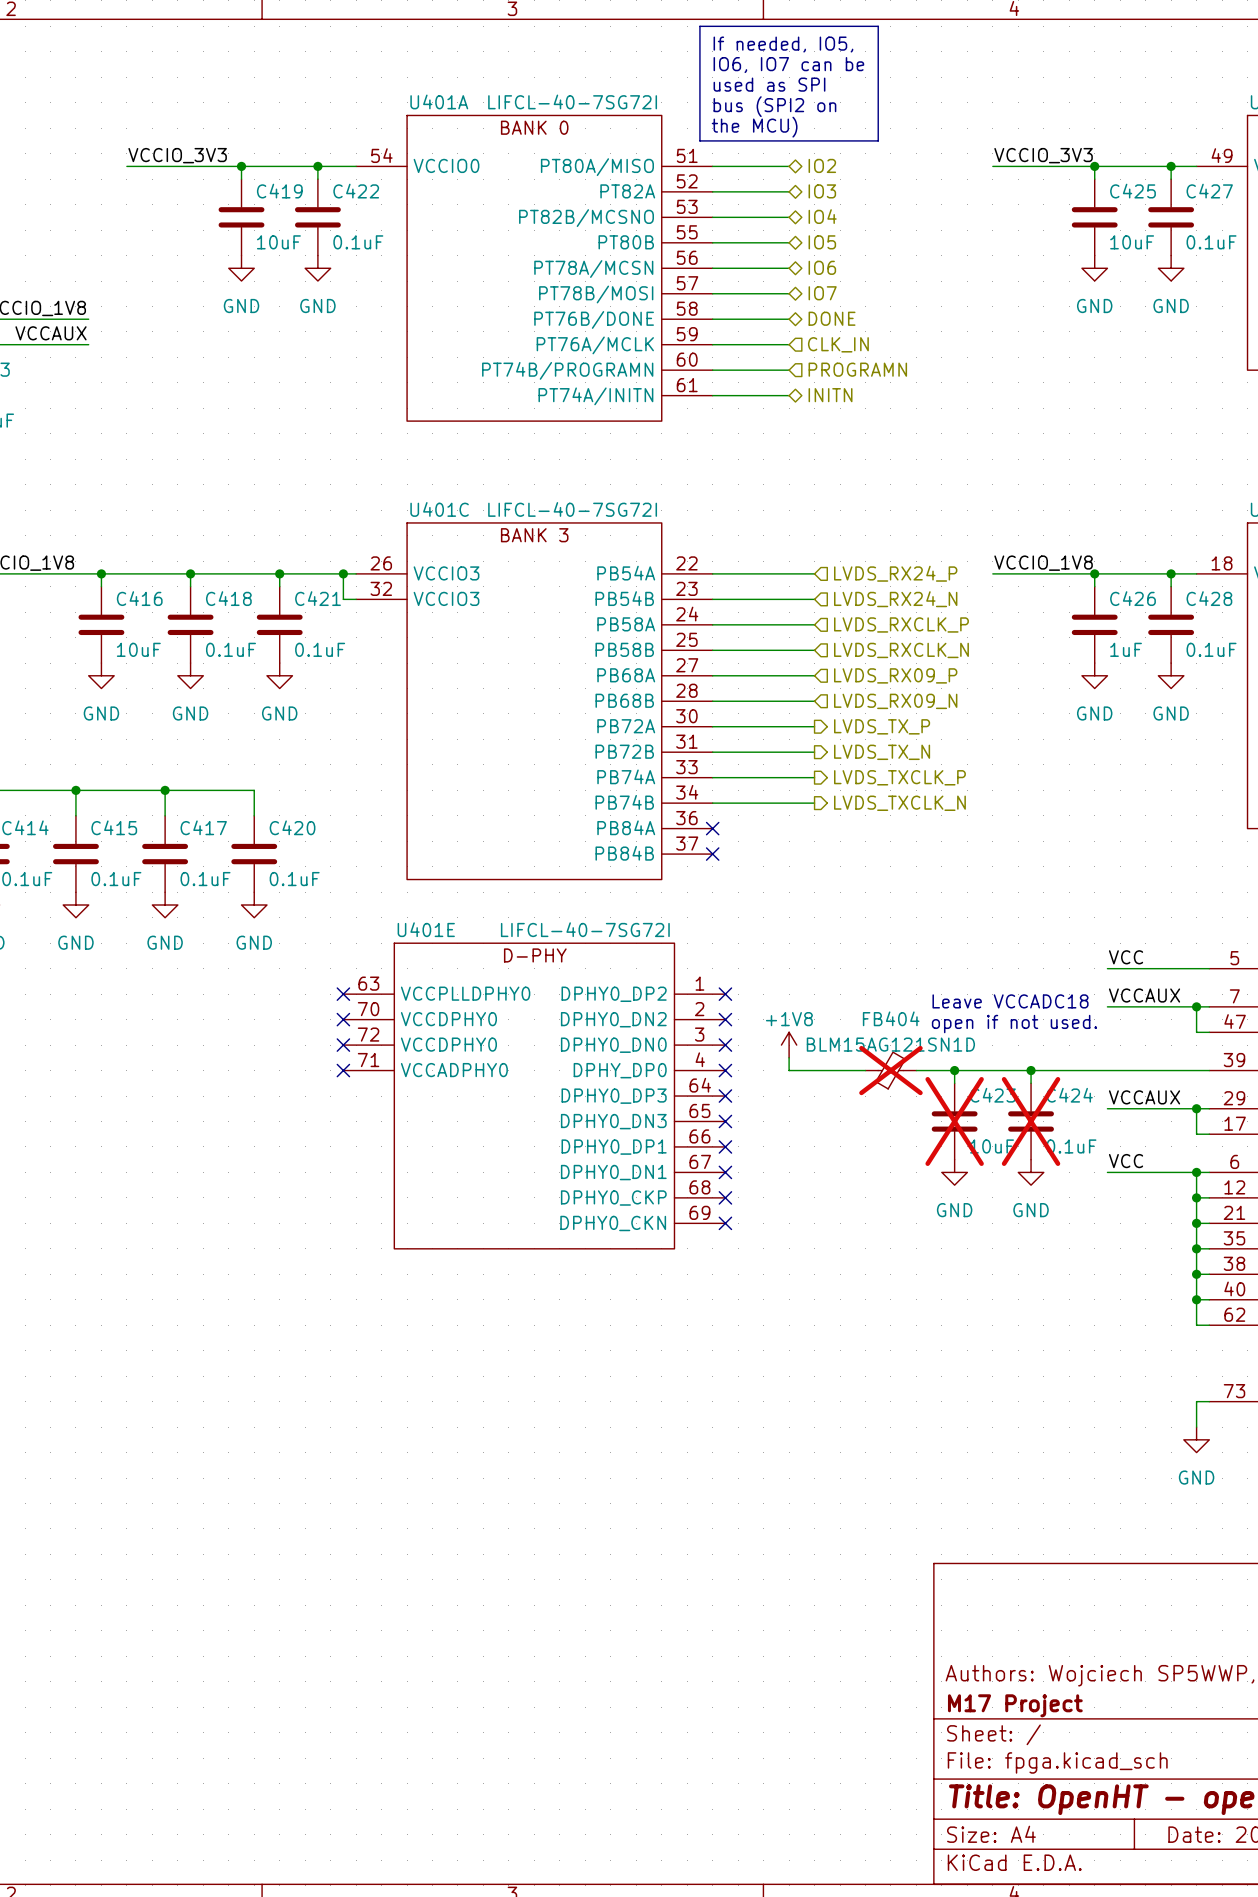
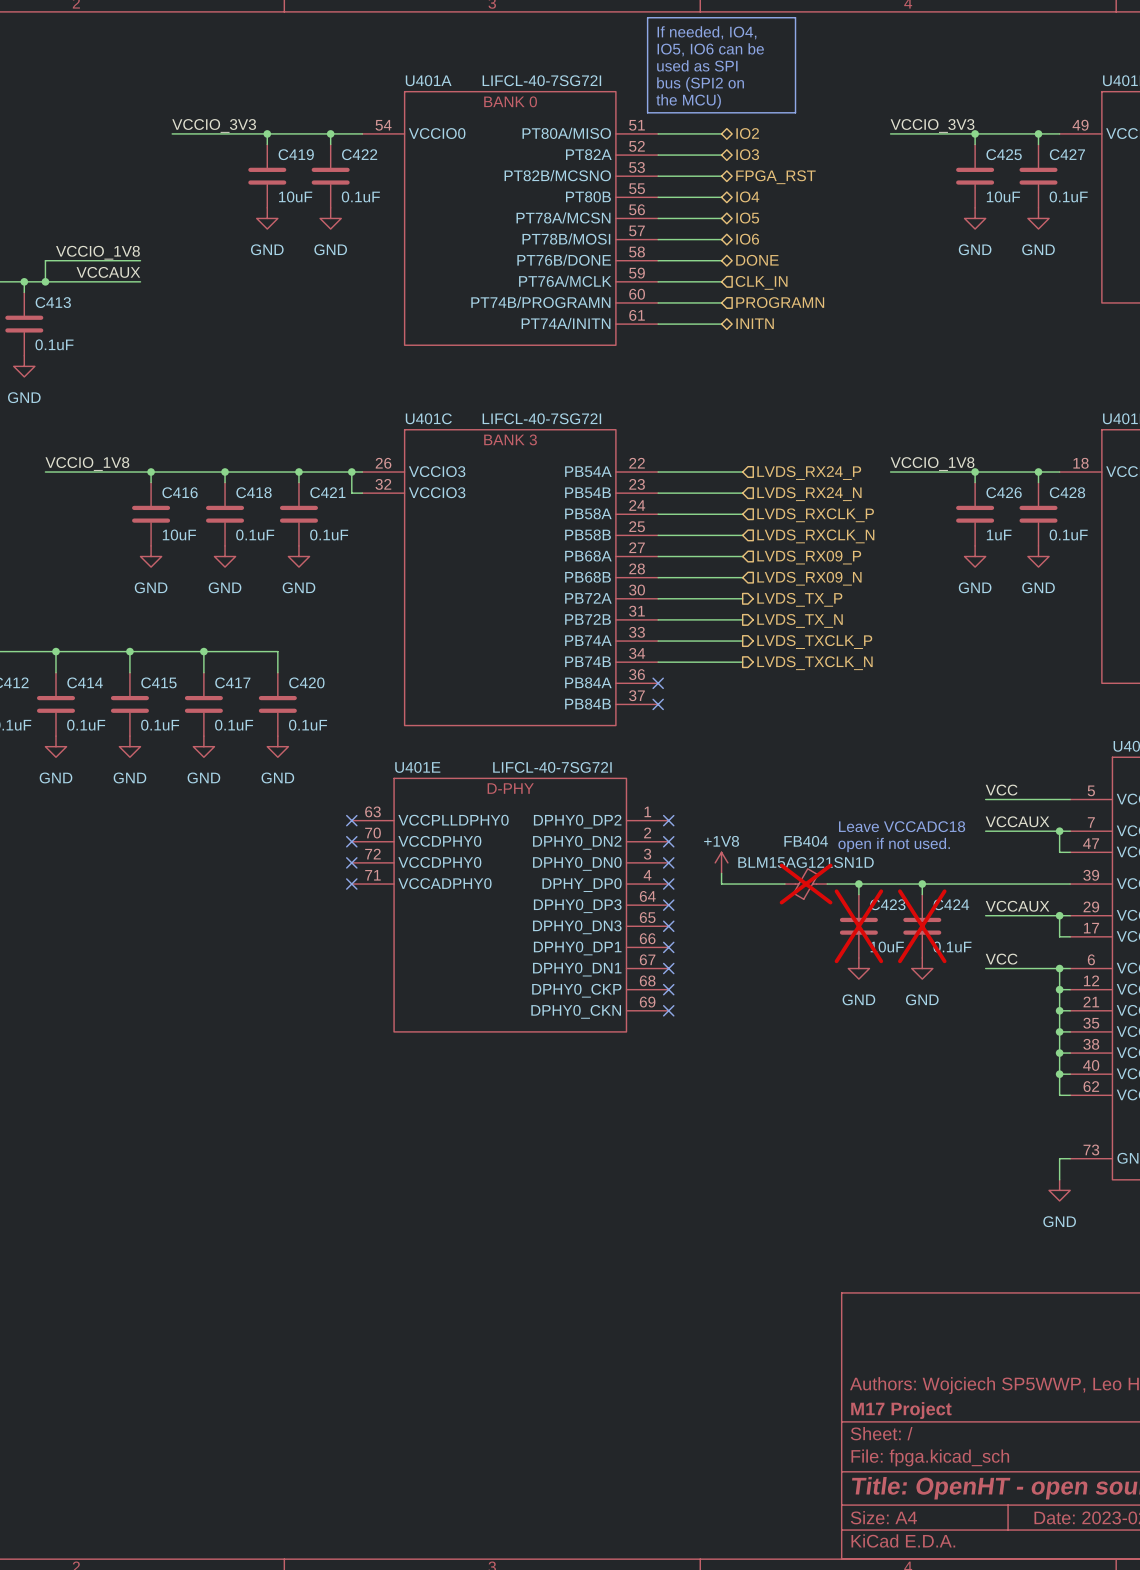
text: If needed, IO5, (783, 44) -> If needed, IO4, (706, 32)
text: IO6, IO7 can be (788, 65) -> IO5, IO6 can be (710, 49)
hierarchical label: IO4 (822, 216) -> FPGA_RST (775, 177)
hierarchical label: IO5 (822, 242) -> IO4 (747, 196)
hierarchical label: IO6 (822, 267) -> IO5 (747, 218)
hierarchical label: IO7 (822, 293) -> IO6 (747, 239)

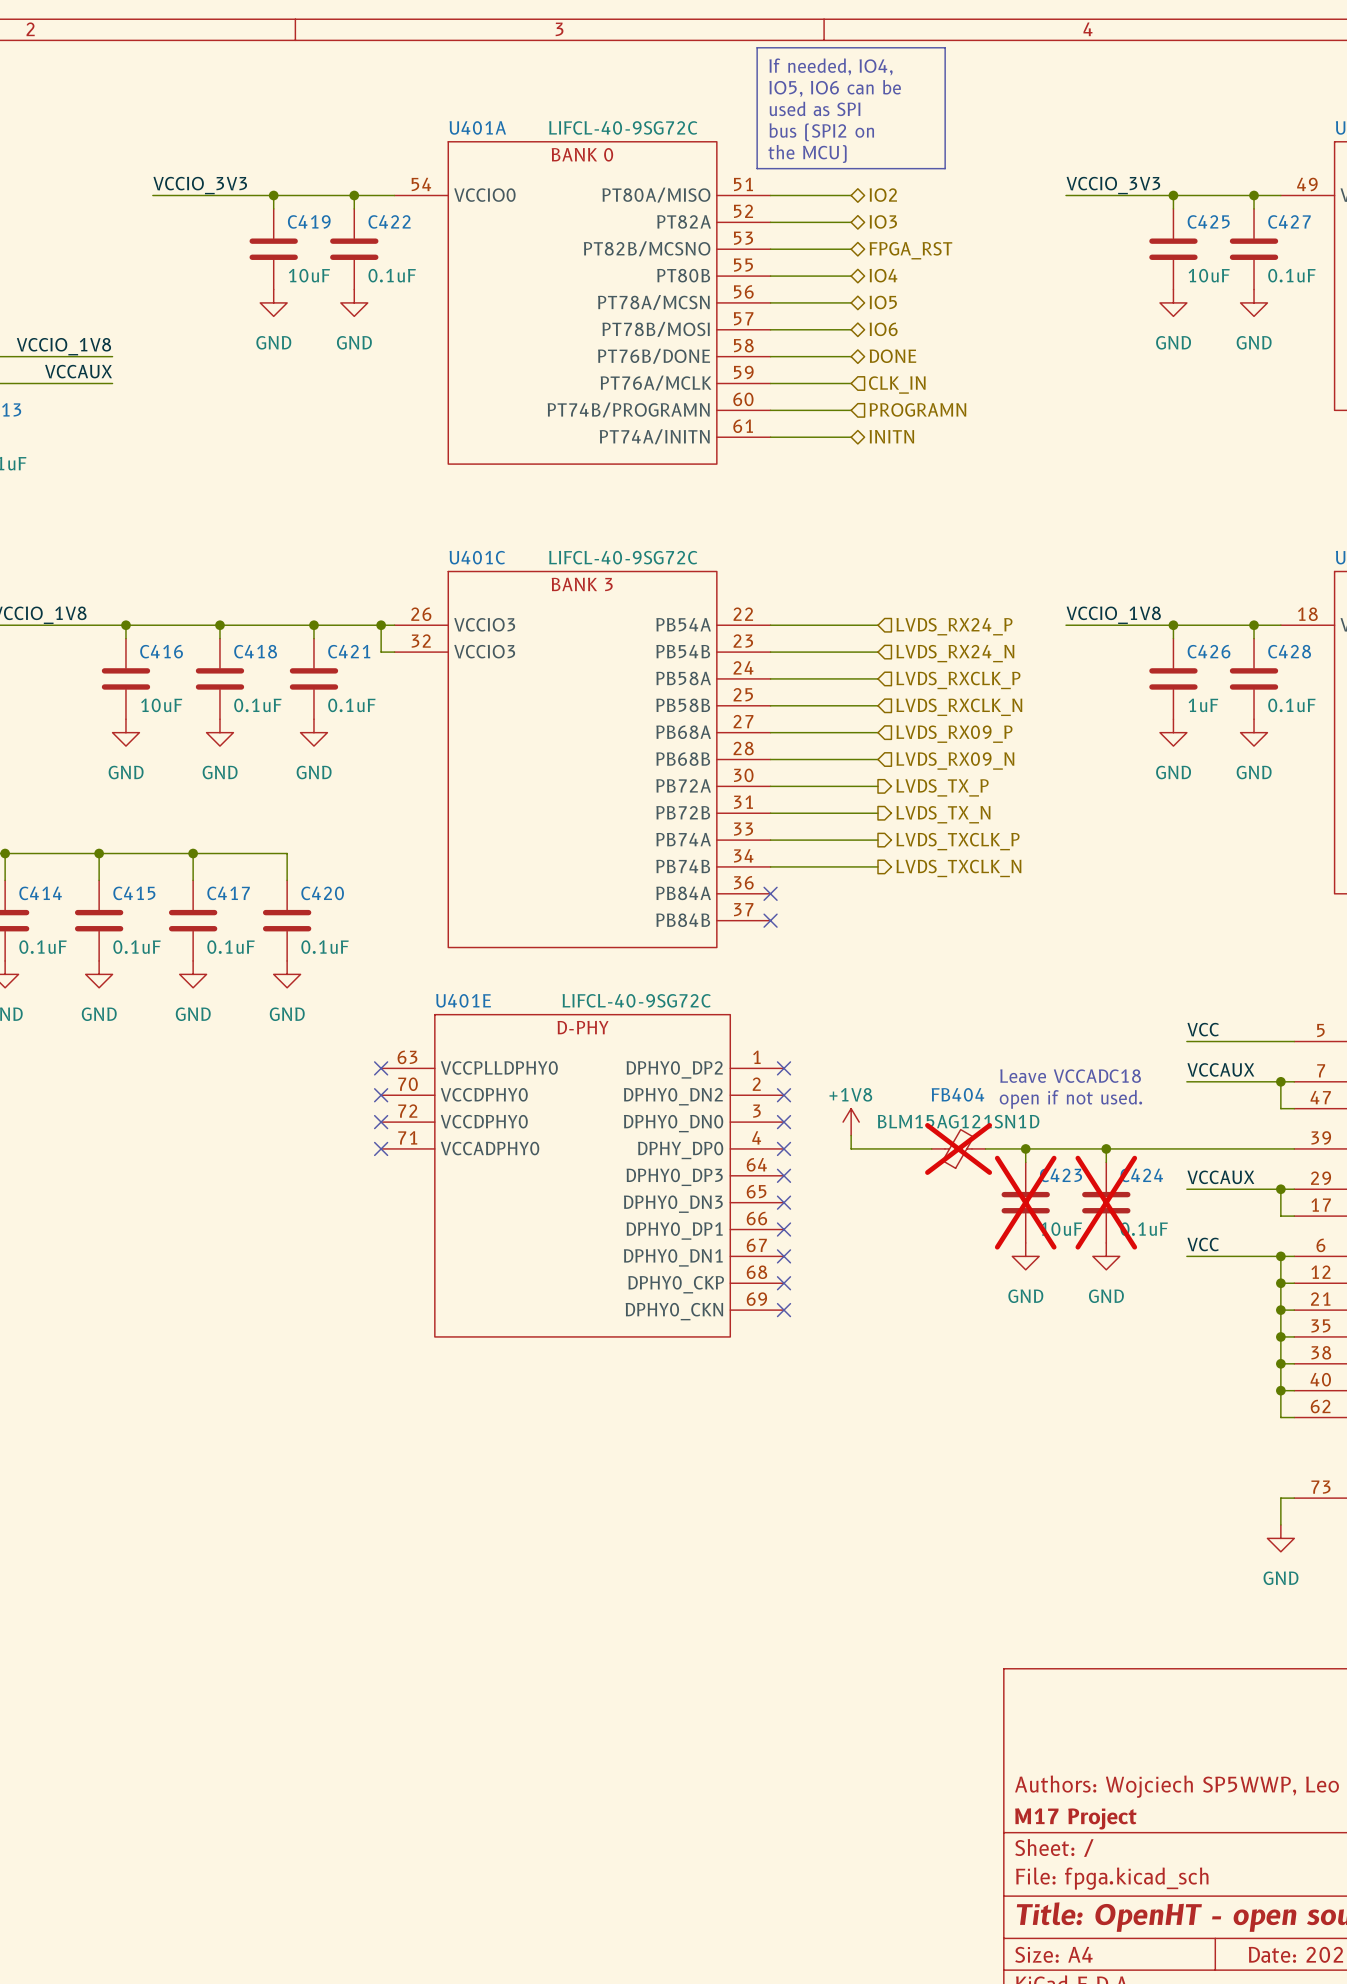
U401A value: LIFCL-40-7SG72I (541, 80) -> LIFCL-40-9SG72C (623, 127)
U401C value: LIFCL-40-7SG72I (541, 418) -> LIFCL-40-9SG72C (623, 557)
U401E value: LIFCL-40-7SG72I (552, 767) -> LIFCL-40-9SG72C (636, 1000)

